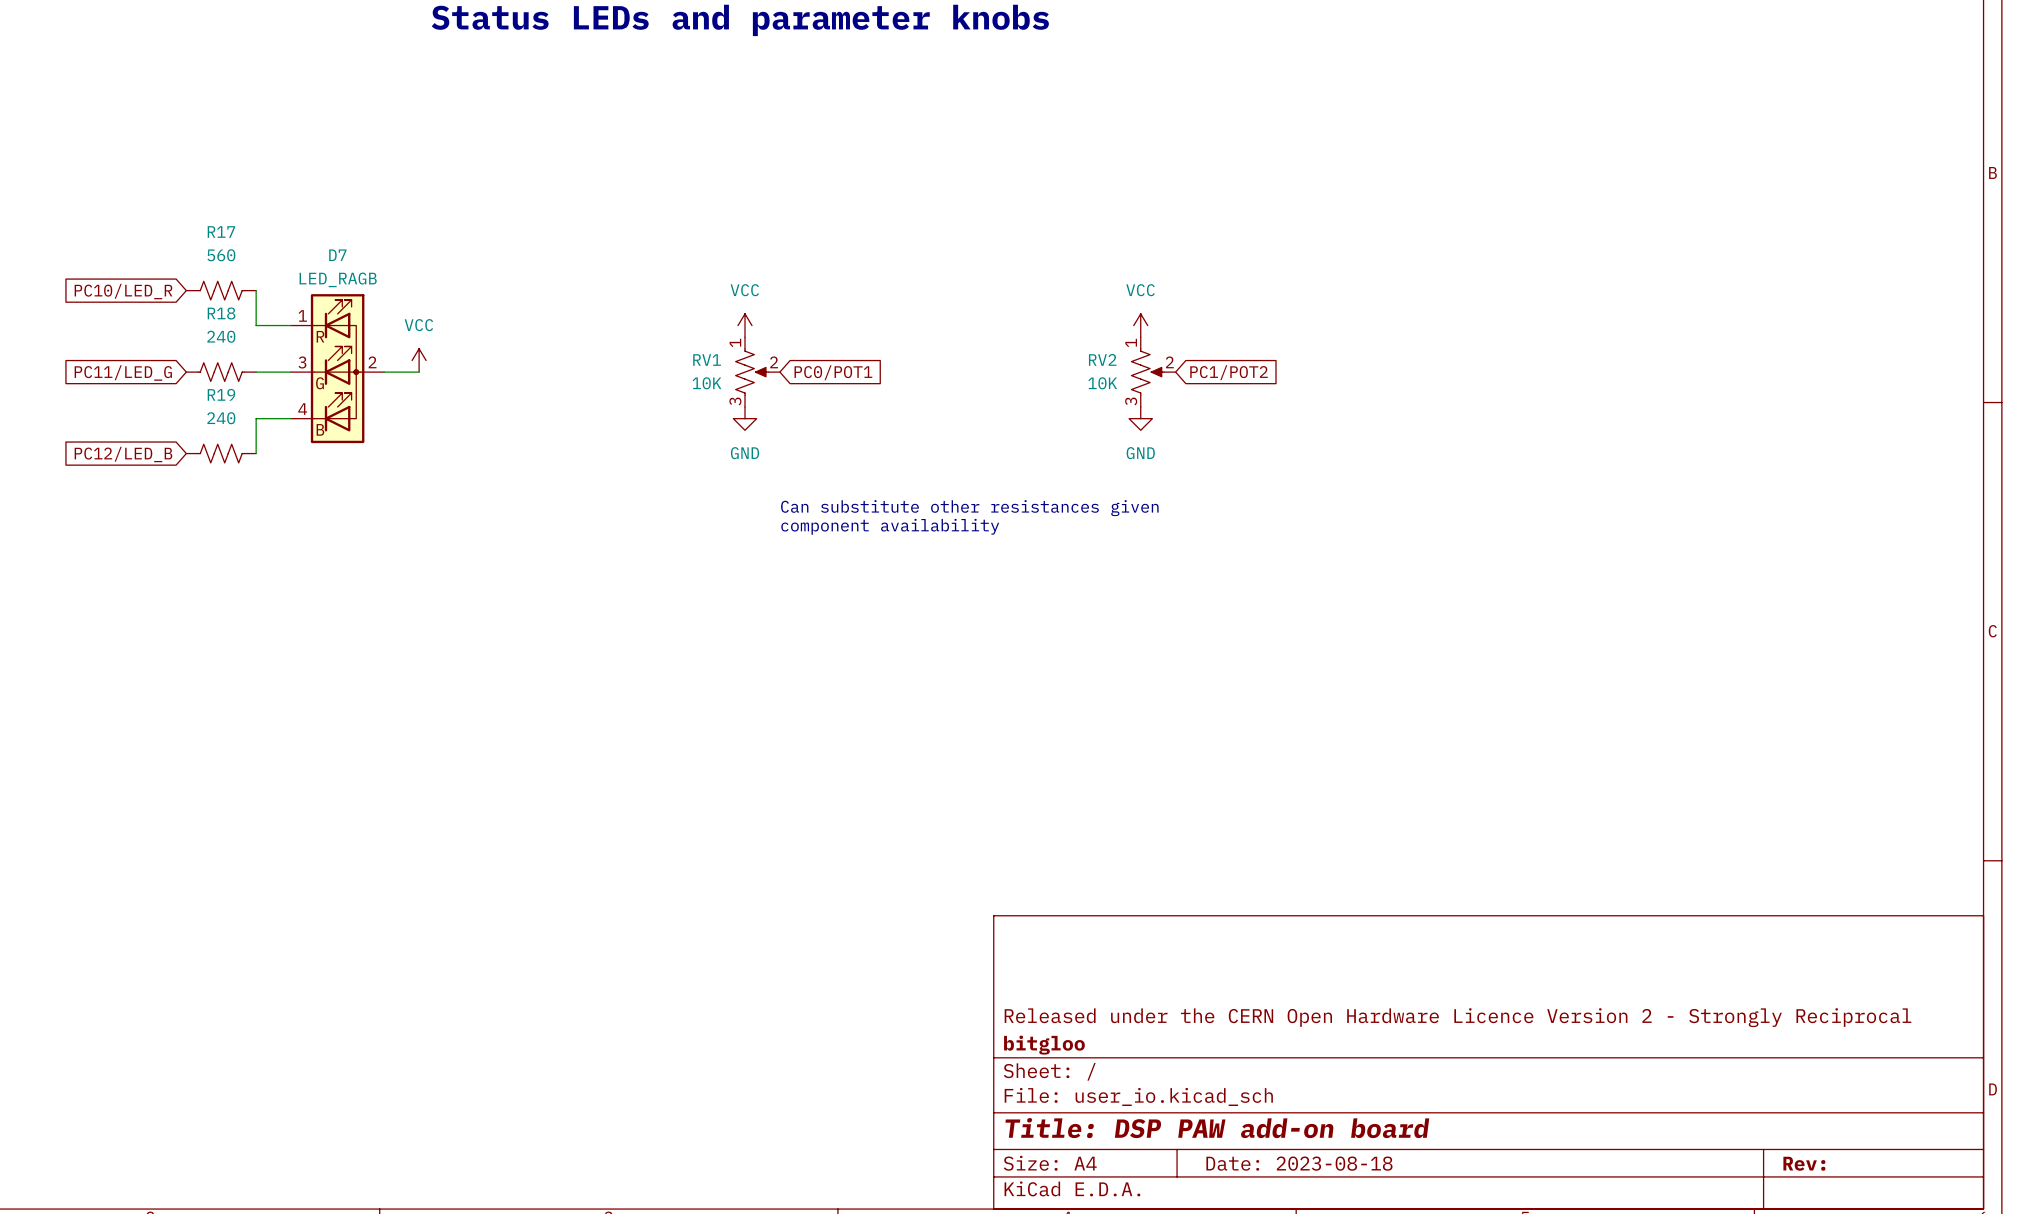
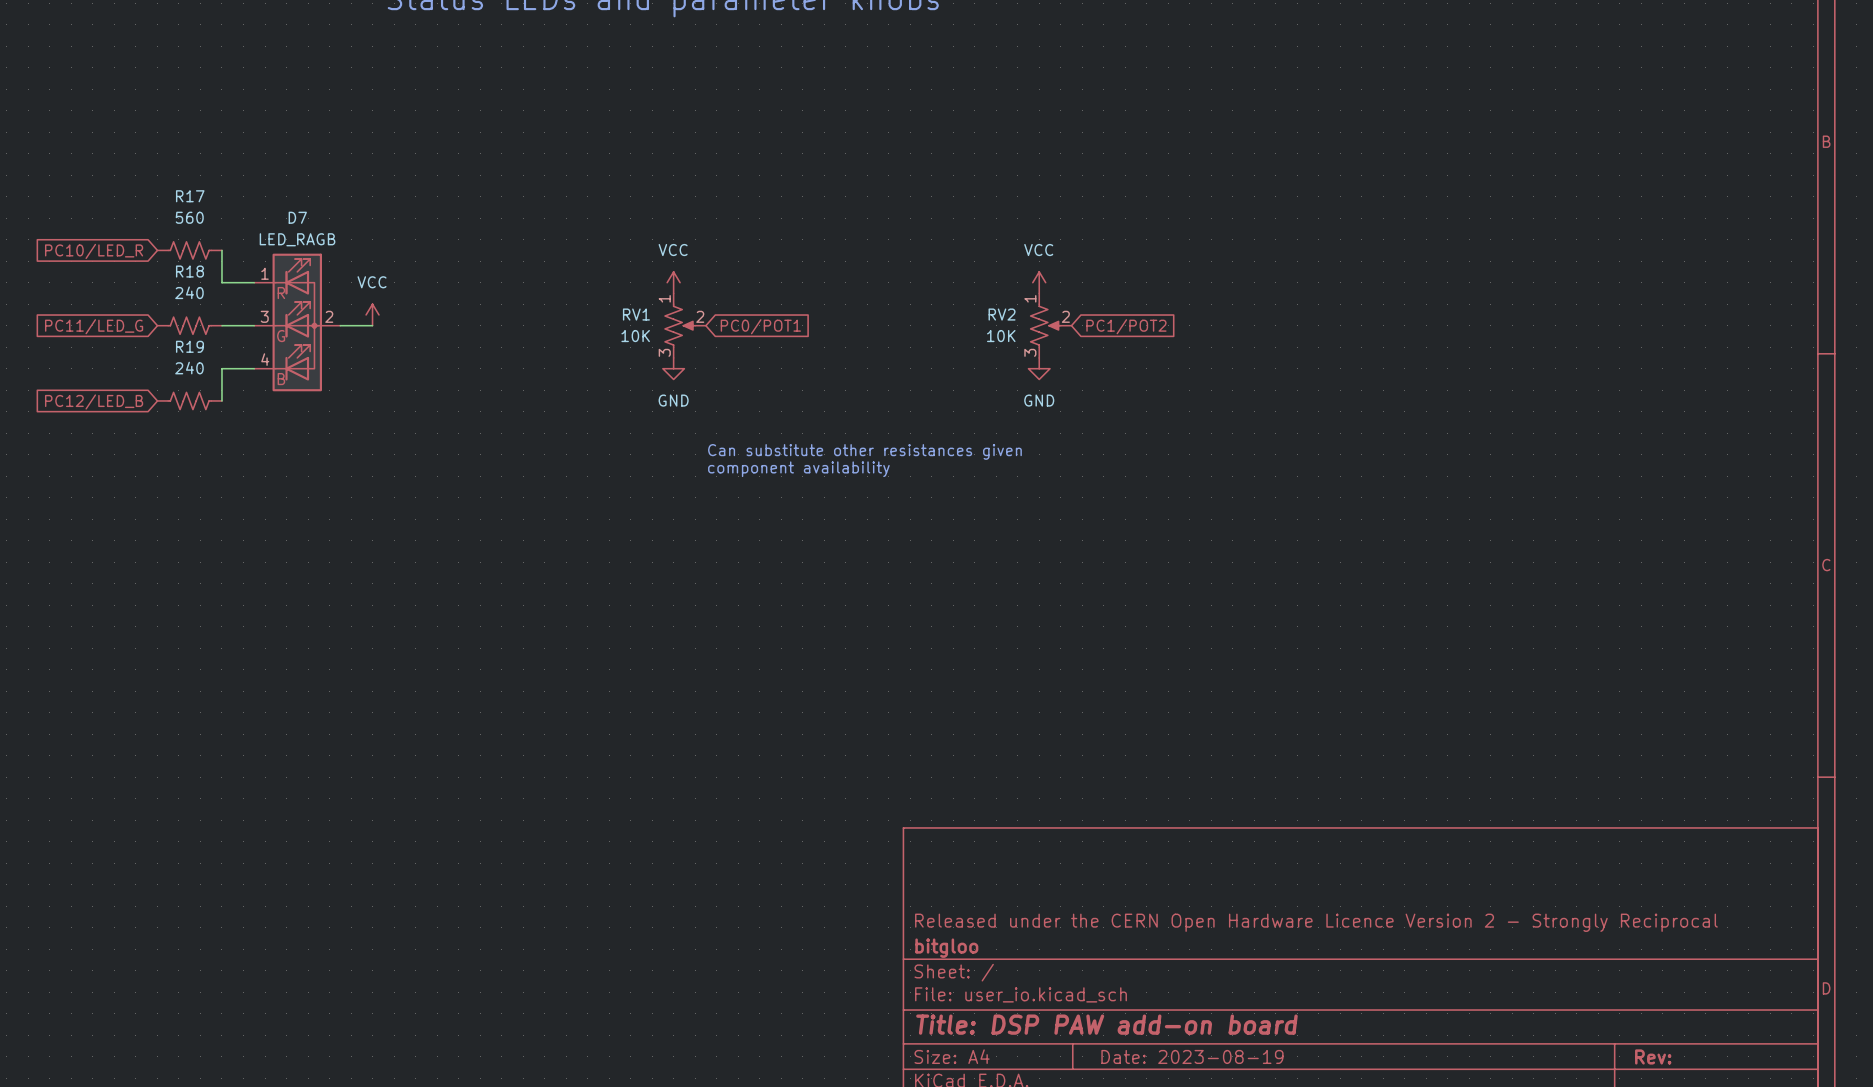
title block: Date: 2023-08-18 (1299, 1163) -> Date: 2023-08-19 (1192, 1056)

